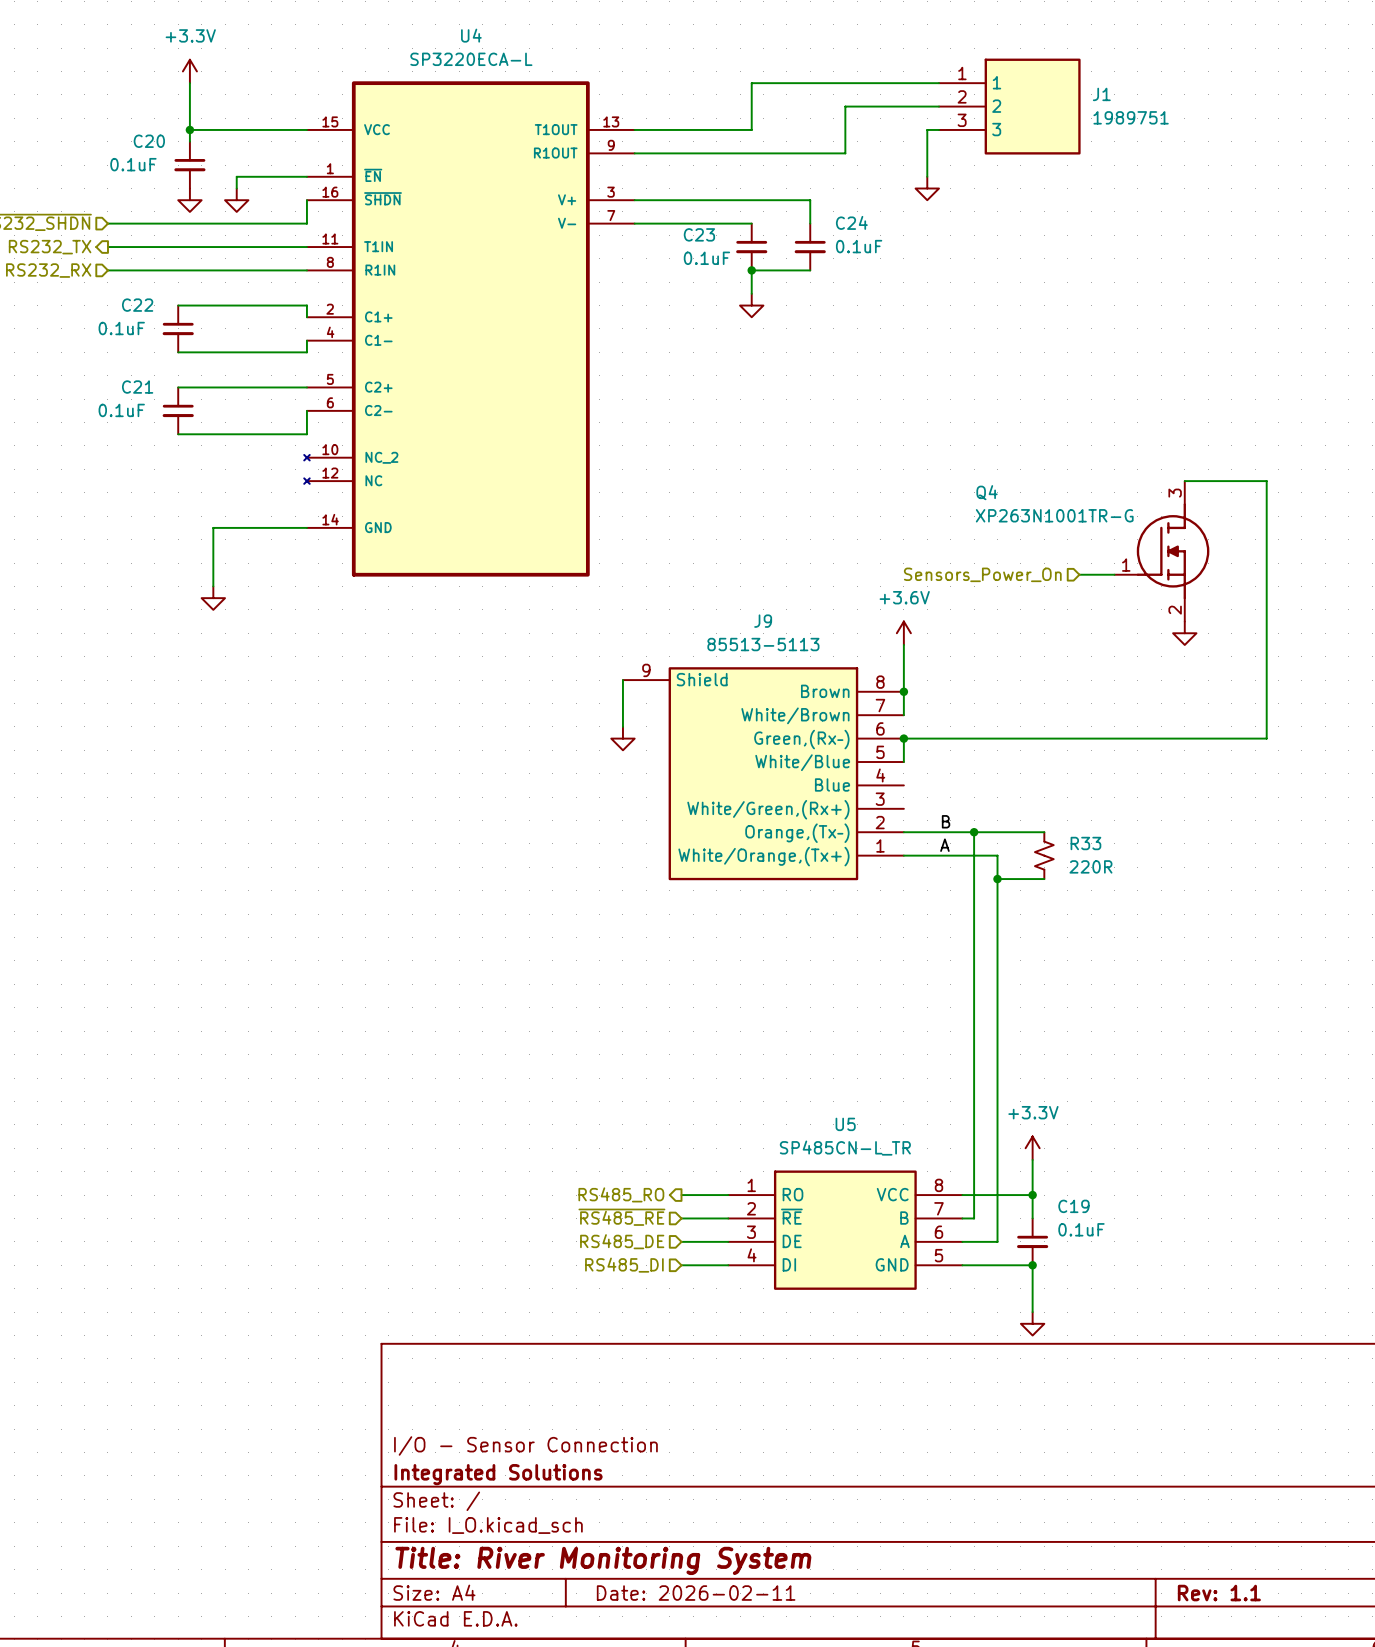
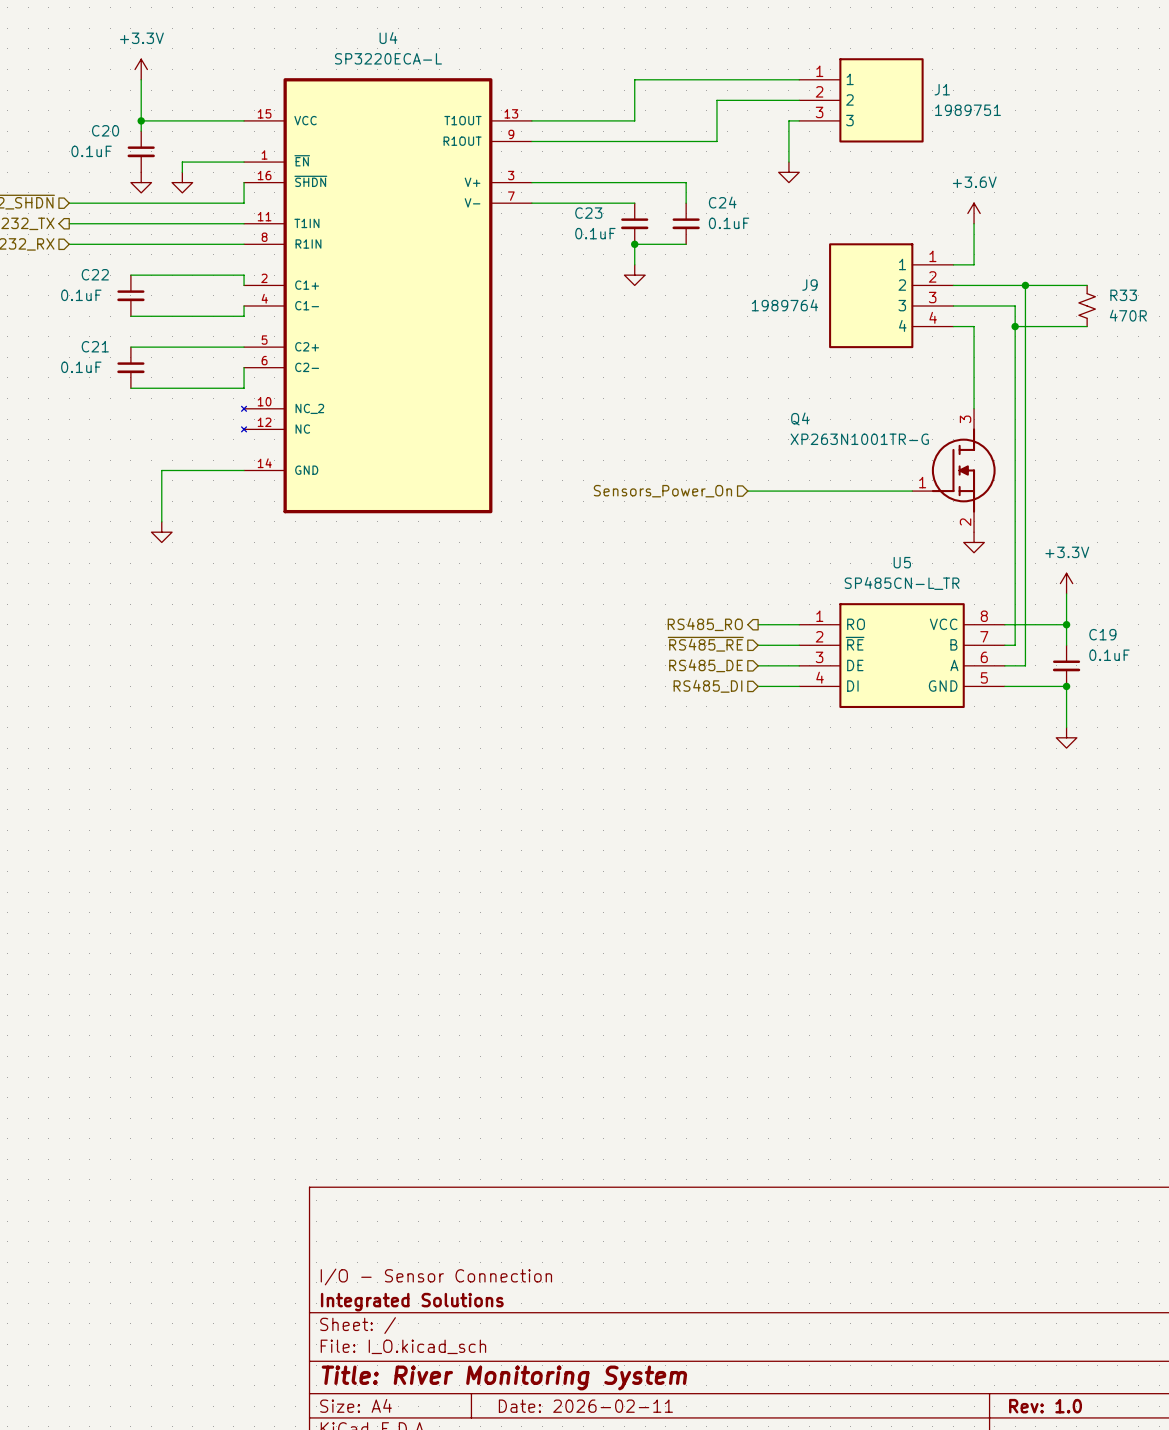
power symbol: none -> +3.6V (974, 213)
wire: none -> (974, 223) (974, 264) (953, 264)
wire: none -> (953, 285) (1087, 285)
wire: none -> (1025, 285) (1025, 665) (1004, 665)
junction: none -> (1025, 285)
wire: none -> (953, 305) (1015, 305) (1015, 645) (1004, 645)
wire: none -> (953, 326) (974, 326) (974, 408)
wire: none -> (1015, 326) (1087, 326)
junction: none -> (1015, 326)
wire: (1184, 481) (1266, 481) (1266, 738) (903, 738) (903, 762) -> none
wire: none -> (747, 491) (912, 491)
Q4 position: (1161, 551) -> (953, 470)
hierarchical label position: Sensors_Power_On (982, 574) -> Sensors_Power_On (662, 491)
wire: (1079, 574) (1114, 574) -> none
J9 name position: J9 (763, 621) -> J9 (809, 285)
power symbol: +3.6V (903, 633) -> none
power symbol position: (1184, 633) -> (974, 542)
J9 value: 85513-5113 (763, 644) -> 1989764 (784, 305)
wire: (903, 644) (903, 715) -> none
power symbol: none -> +3.3V (1066, 583)
J9 symbol: [622, 667, 904, 881] -> [829, 243, 954, 349]
wire: none -> (1066, 593) (1066, 645)
wire: (622, 680) (622, 726) -> none
junction: (903, 691) -> none
hierarchical label: none -> RS485_RO (705, 624)
wire: none -> (758, 624) (799, 624)
wire: none -> (1004, 624) (1066, 624)
junction: none -> (1066, 624)
hierarchical label: none -> ~{RS485_RE} (705, 644)
wire: none -> (758, 645) (799, 645)
power symbol: (622, 738) -> none
junction: (903, 738) -> none
hierarchical label: none -> RS485_DE (706, 665)
wire: none -> (758, 665) (799, 665)
hierarchical label: none -> RS485_DI (707, 686)
wire: none -> (1004, 686) (1066, 686) (1066, 727)
junction: none -> (1066, 686)
label: B (946, 821) -> none
wire: (903, 832) (1044, 832) -> none
wire: (974, 832) (974, 1218) (962, 1218) -> none
junction: (974, 832) -> none
power symbol: none -> (1066, 737)
label: A (944, 845) -> none
wire: (903, 855) (997, 855) (997, 1241) (962, 1241) -> none
R33 position: (1044, 855) -> (1087, 305)
R33 value: 220R (1090, 866) -> 470R (1128, 315)
wire: (997, 879) (1044, 879) -> (758, 686) (799, 686)
junction: (997, 879) -> none
power symbol: +3.3V (1032, 1148) -> none
wire: (1032, 1159) (1032, 1218) -> none
hierarchical label: RS485_RO (621, 1194) -> none
wire: (681, 1195) (728, 1195) -> none
wire: (962, 1195) (1032, 1195) -> none
junction: (1032, 1195) -> none
hierarchical label: ~{RS485_RE} (621, 1217) -> none
wire: (681, 1218) (728, 1218) -> none
U5 position: (845, 1230) -> (902, 655)
hierarchical label: RS485_DE (622, 1241) -> none
wire: (681, 1241) (728, 1241) -> none
C19 position: (1032, 1241) -> (1066, 665)
hierarchical label: RS485_DI (624, 1265) -> none
wire: (681, 1265) (728, 1265) -> none
wire: (962, 1265) (1032, 1265) (1032, 1312) -> none
junction: (1032, 1265) -> none
power symbol: (1032, 1323) -> none
title block: Rev: 1.1 (1219, 1593) -> Rev: 1.0 (1045, 1406)

